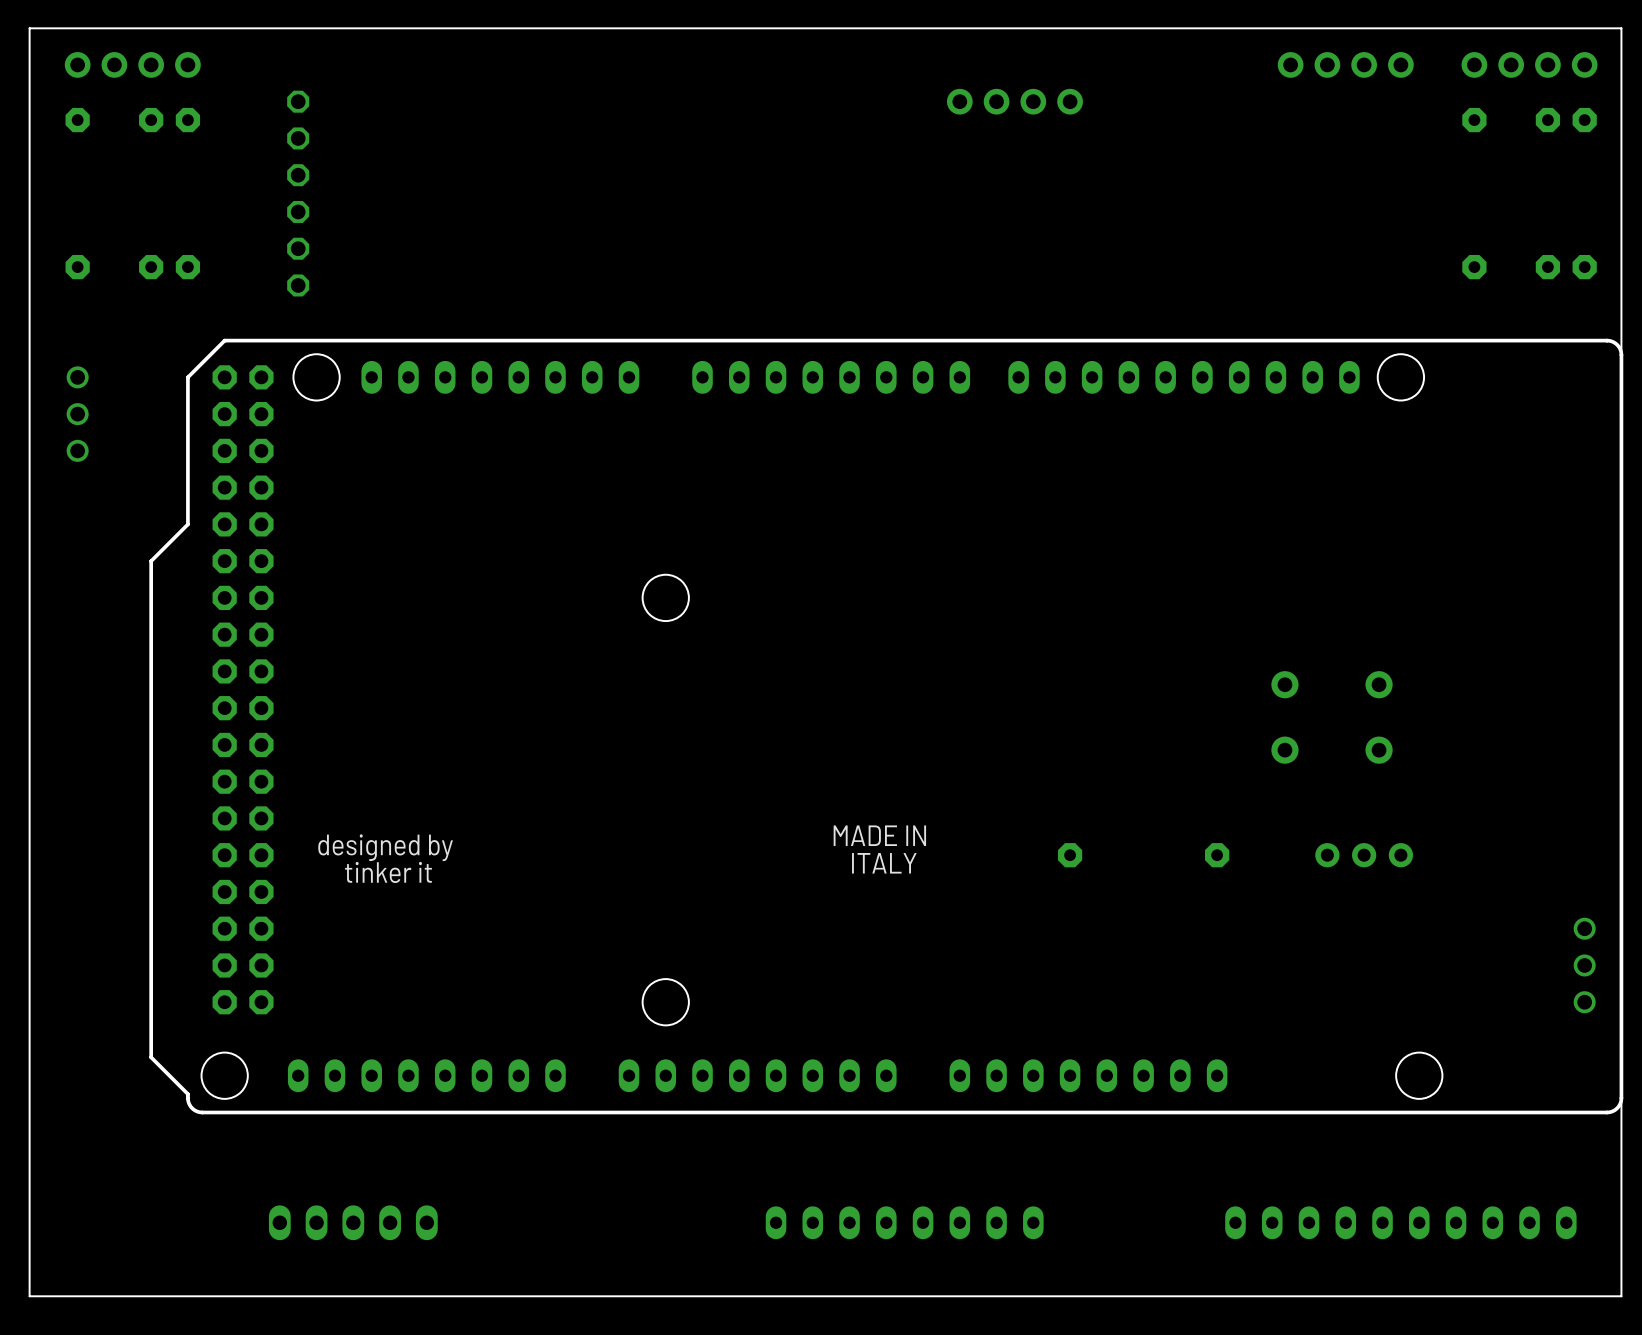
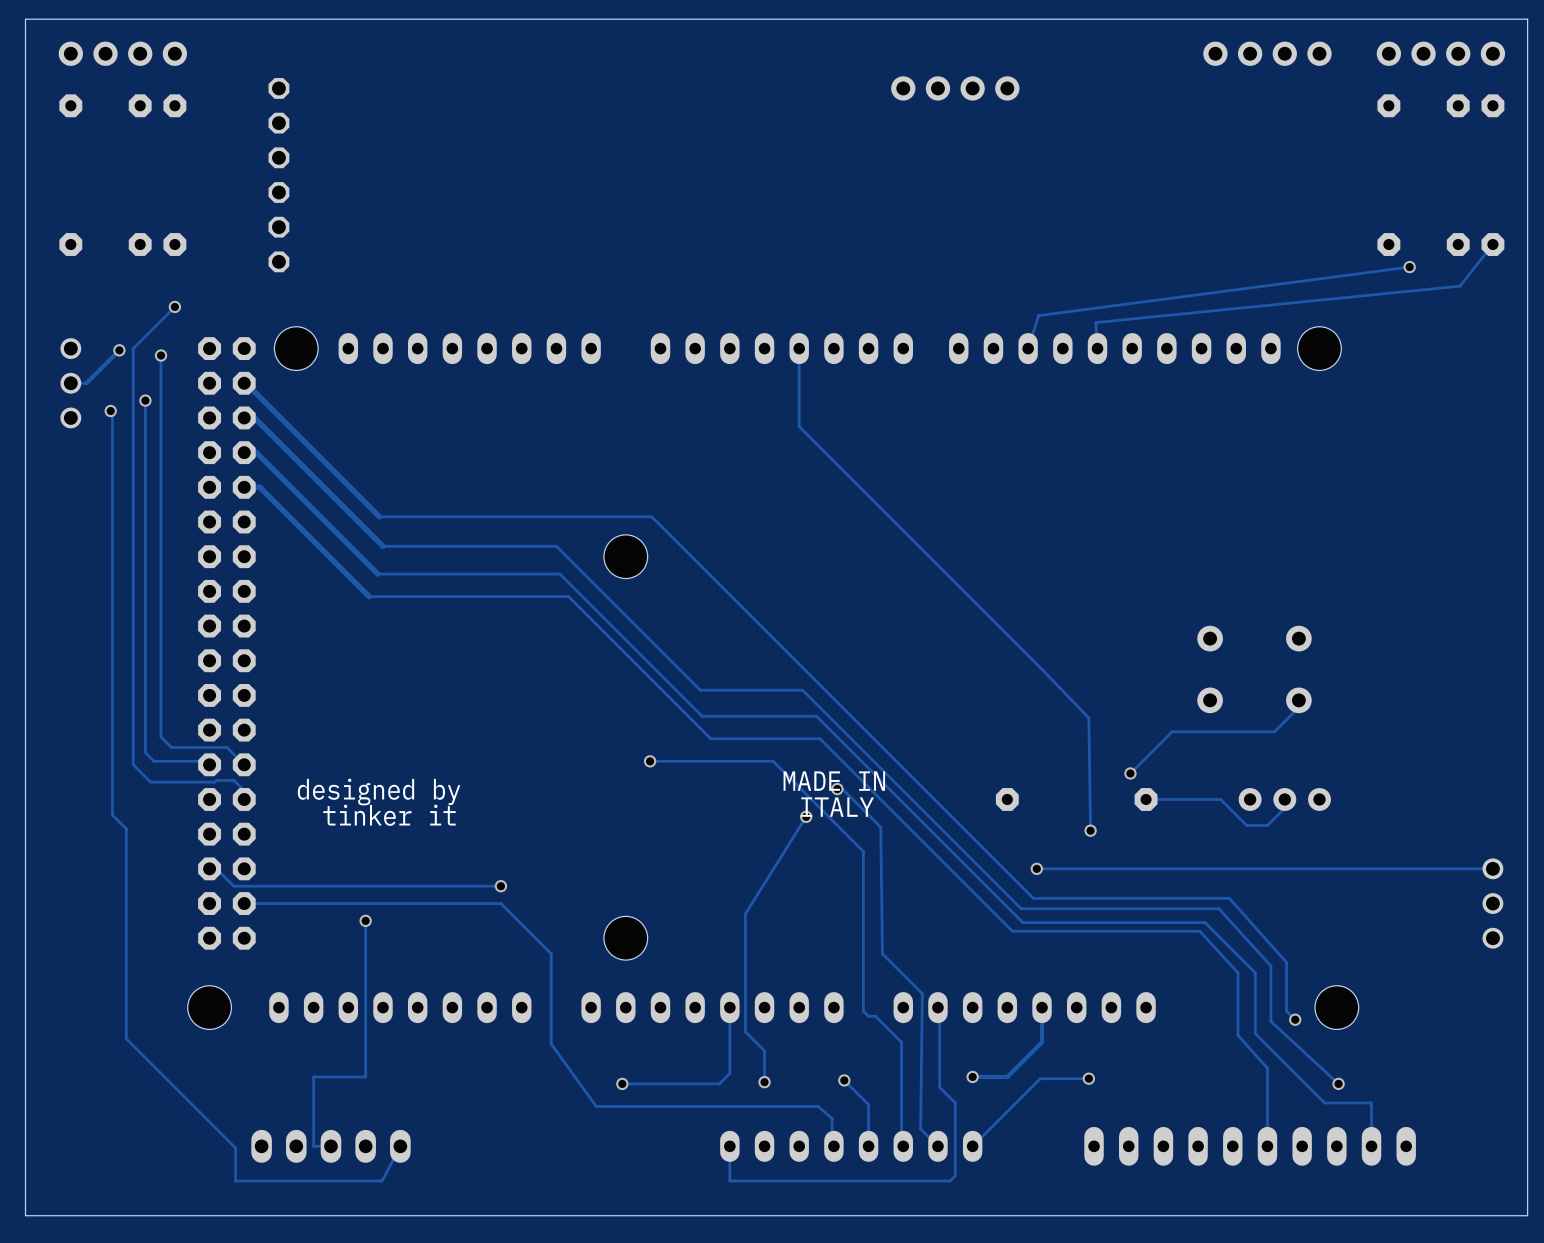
track: none -> (1492, 244) (1459, 286) (1095, 322) (1097, 348)
track: none -> (1409, 267) (1038, 315) (1028, 348)
via: none -> (1409, 267)
track: none -> (174, 306) (133, 348) (133, 764) (150, 782) (233, 780) (244, 790) (244, 799)
via: none -> (174, 306)
board edge: (1606, 340) (224, 340) (187, 377) (187, 524) (151, 561) (151, 1057) (187, 1094) (188, 1101) (192, 1108) (202, 1112) (1612, 1111) (1618, 1106) (1621, 1098) (1621, 355) (1617, 344) (1606, 340) -> none
track: none -> (799, 348) (799, 426) (1088, 717) (1090, 830)
track: none -> (119, 350) (86, 383) (70, 383)
via: none -> (119, 350)
track: none -> (161, 355) (161, 737) (171, 747) (226, 747) (244, 764)
via: none -> (161, 355)
track: none -> (244, 383) (379, 516) (651, 516) (1033, 898) (1229, 898) (1286, 962) (1286, 1011) (1295, 1019)
track: none -> (145, 400) (145, 752) (154, 761) (206, 761) (209, 764)
via: none -> (145, 400)
track: none -> (110, 411) (112, 412) (112, 815) (126, 828) (126, 1038) (235, 1148) (235, 1181) (381, 1181) (400, 1146)
via: none -> (110, 411)
track: none -> (244, 417) (254, 417) (383, 546) (556, 546) (700, 690) (802, 690) (1021, 908) (1218, 908) (1270, 965) (1270, 1021) (1338, 1083)
track: none -> (244, 452) (256, 452) (377, 574) (559, 574) (702, 716) (816, 716) (1022, 922) (1205, 922) (1255, 972) (1255, 1033) (1324, 1102) (1371, 1102) (1371, 1144)
track: none -> (244, 487) (259, 487) (369, 596) (568, 596) (710, 738) (820, 738) (1012, 931) (1199, 931) (1237, 972) (1237, 1035) (1267, 1068) (1267, 1146)
track: none -> (1298, 700) (1298, 707) (1274, 731) (1172, 731) (1130, 773)
track: none -> (650, 761) (773, 761) (863, 851) (863, 1011) (868, 1016) (875, 1016) (901, 1042) (901, 1144) (903, 1146)
via: none -> (650, 761)
via: none -> (1130, 773)
track: none -> (837, 789) (842, 789) (880, 827) (882, 953) (922, 993) (920, 1128) (937, 1146)
via: none -> (837, 789)
track: none -> (1284, 799) (1286, 806) (1267, 825) (1246, 825) (1220, 799) (1146, 799)
track: none -> (806, 816) (745, 913) (745, 1031) (764, 1050) (764, 1082)
via: none -> (806, 816)
via: none -> (1090, 830)
track: none -> (209, 868) (209, 870) (218, 870) (233, 886) (500, 886)
via: none -> (1036, 868)
track: none -> (1492, 868) (1036, 868)
via: none -> (500, 886)
track: none -> (244, 903) (500, 903) (551, 953) (551, 1044) (596, 1106) (818, 1106) (832, 1118) (832, 1144) (833, 1146)
track: none -> (365, 920) (365, 1076) (313, 1076) (313, 1146) (330, 1146)
via: none -> (365, 920)
track: none -> (729, 1007) (729, 1073) (719, 1083) (622, 1083)
track: none -> (937, 1007) (939, 1009) (939, 1087) (955, 1102) (955, 1175) (950, 1181) (729, 1181) (729, 1146)
track: none -> (1042, 1007) (1042, 1042) (1007, 1076) (972, 1076)
via: none -> (1295, 1019)
via: none -> (972, 1076)
track: none -> (1088, 1078) (1040, 1078) (972, 1146)
via: none -> (1088, 1078)
track: none -> (844, 1080) (868, 1104) (868, 1146)
via: none -> (844, 1080)
via: none -> (764, 1082)
via: none -> (622, 1083)
via: none -> (1338, 1083)
part: none -> (1250, 1146)
part: (1400, 1222) -> none

